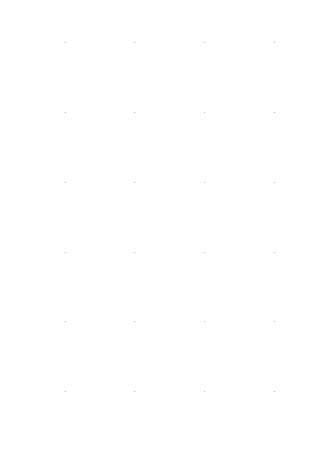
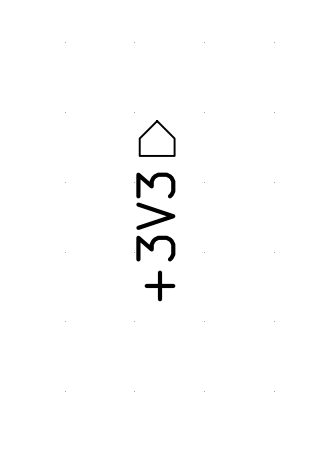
hierarchical label: none -> +3V3 (155, 236)

